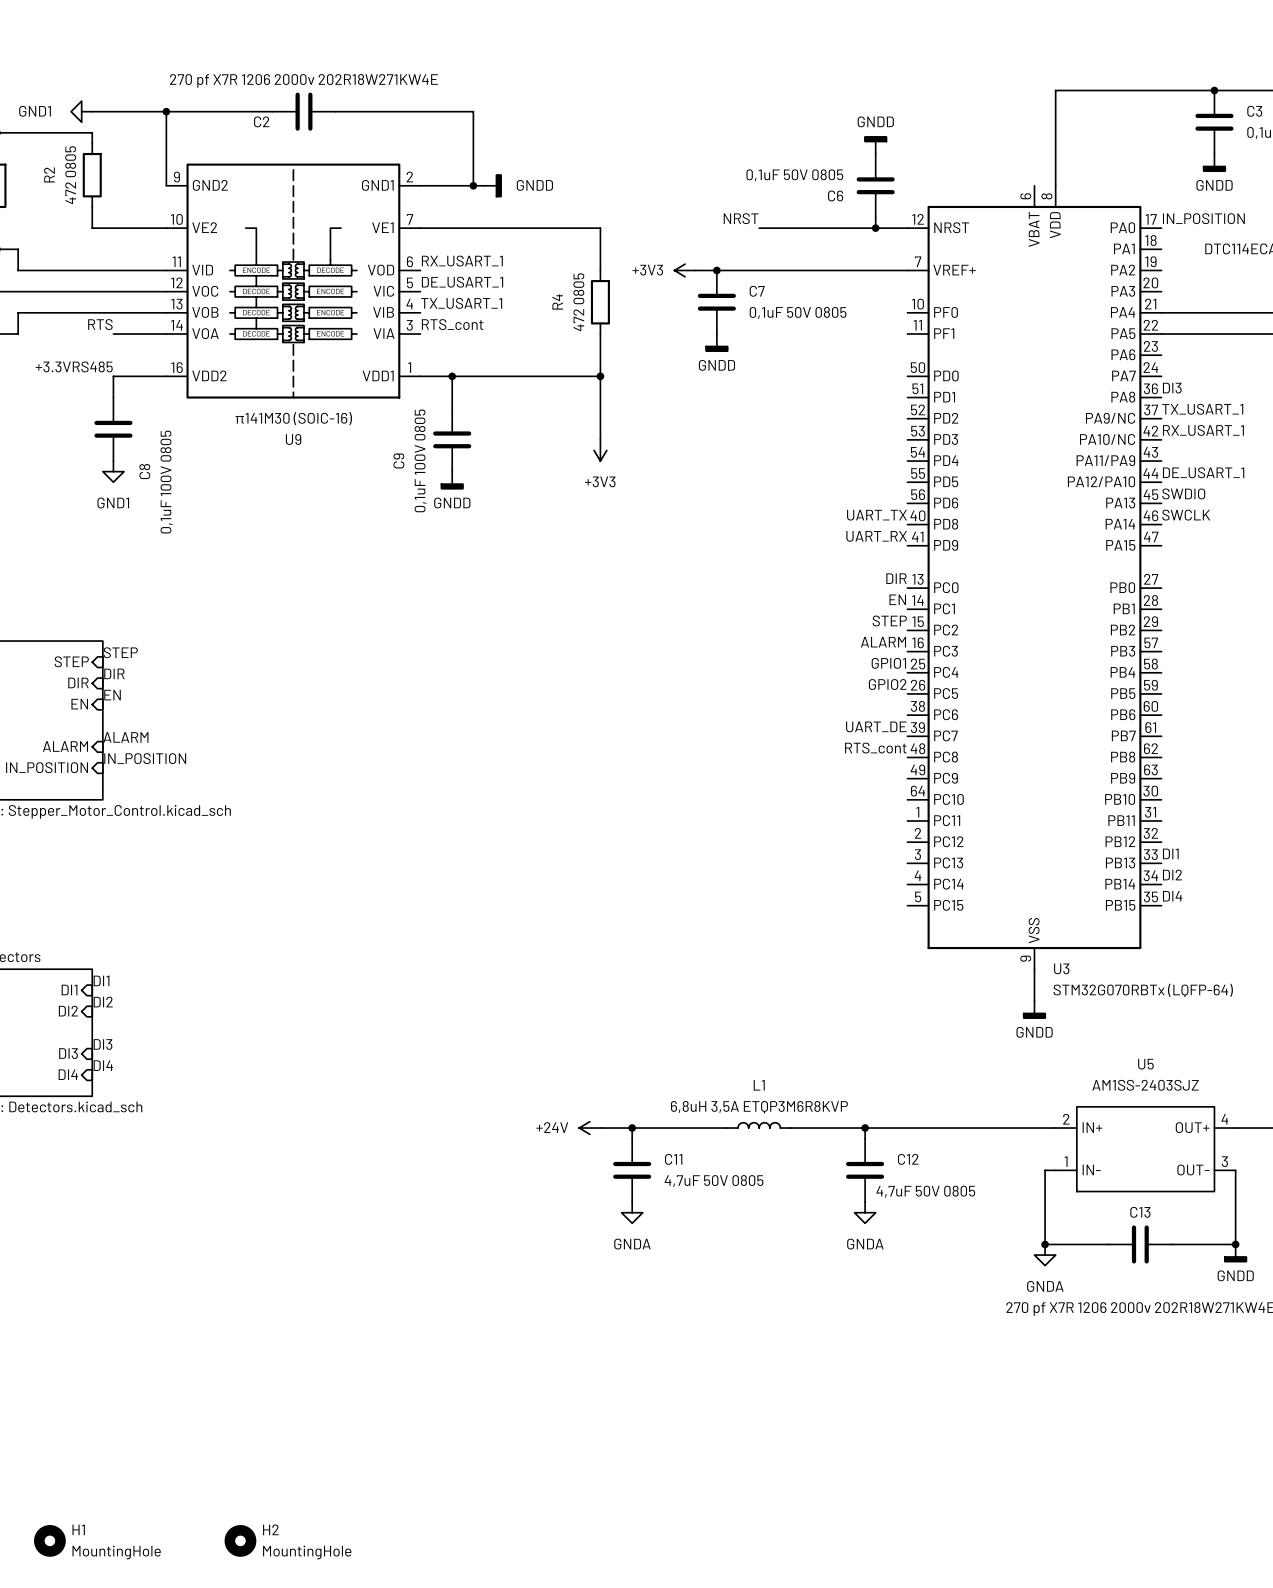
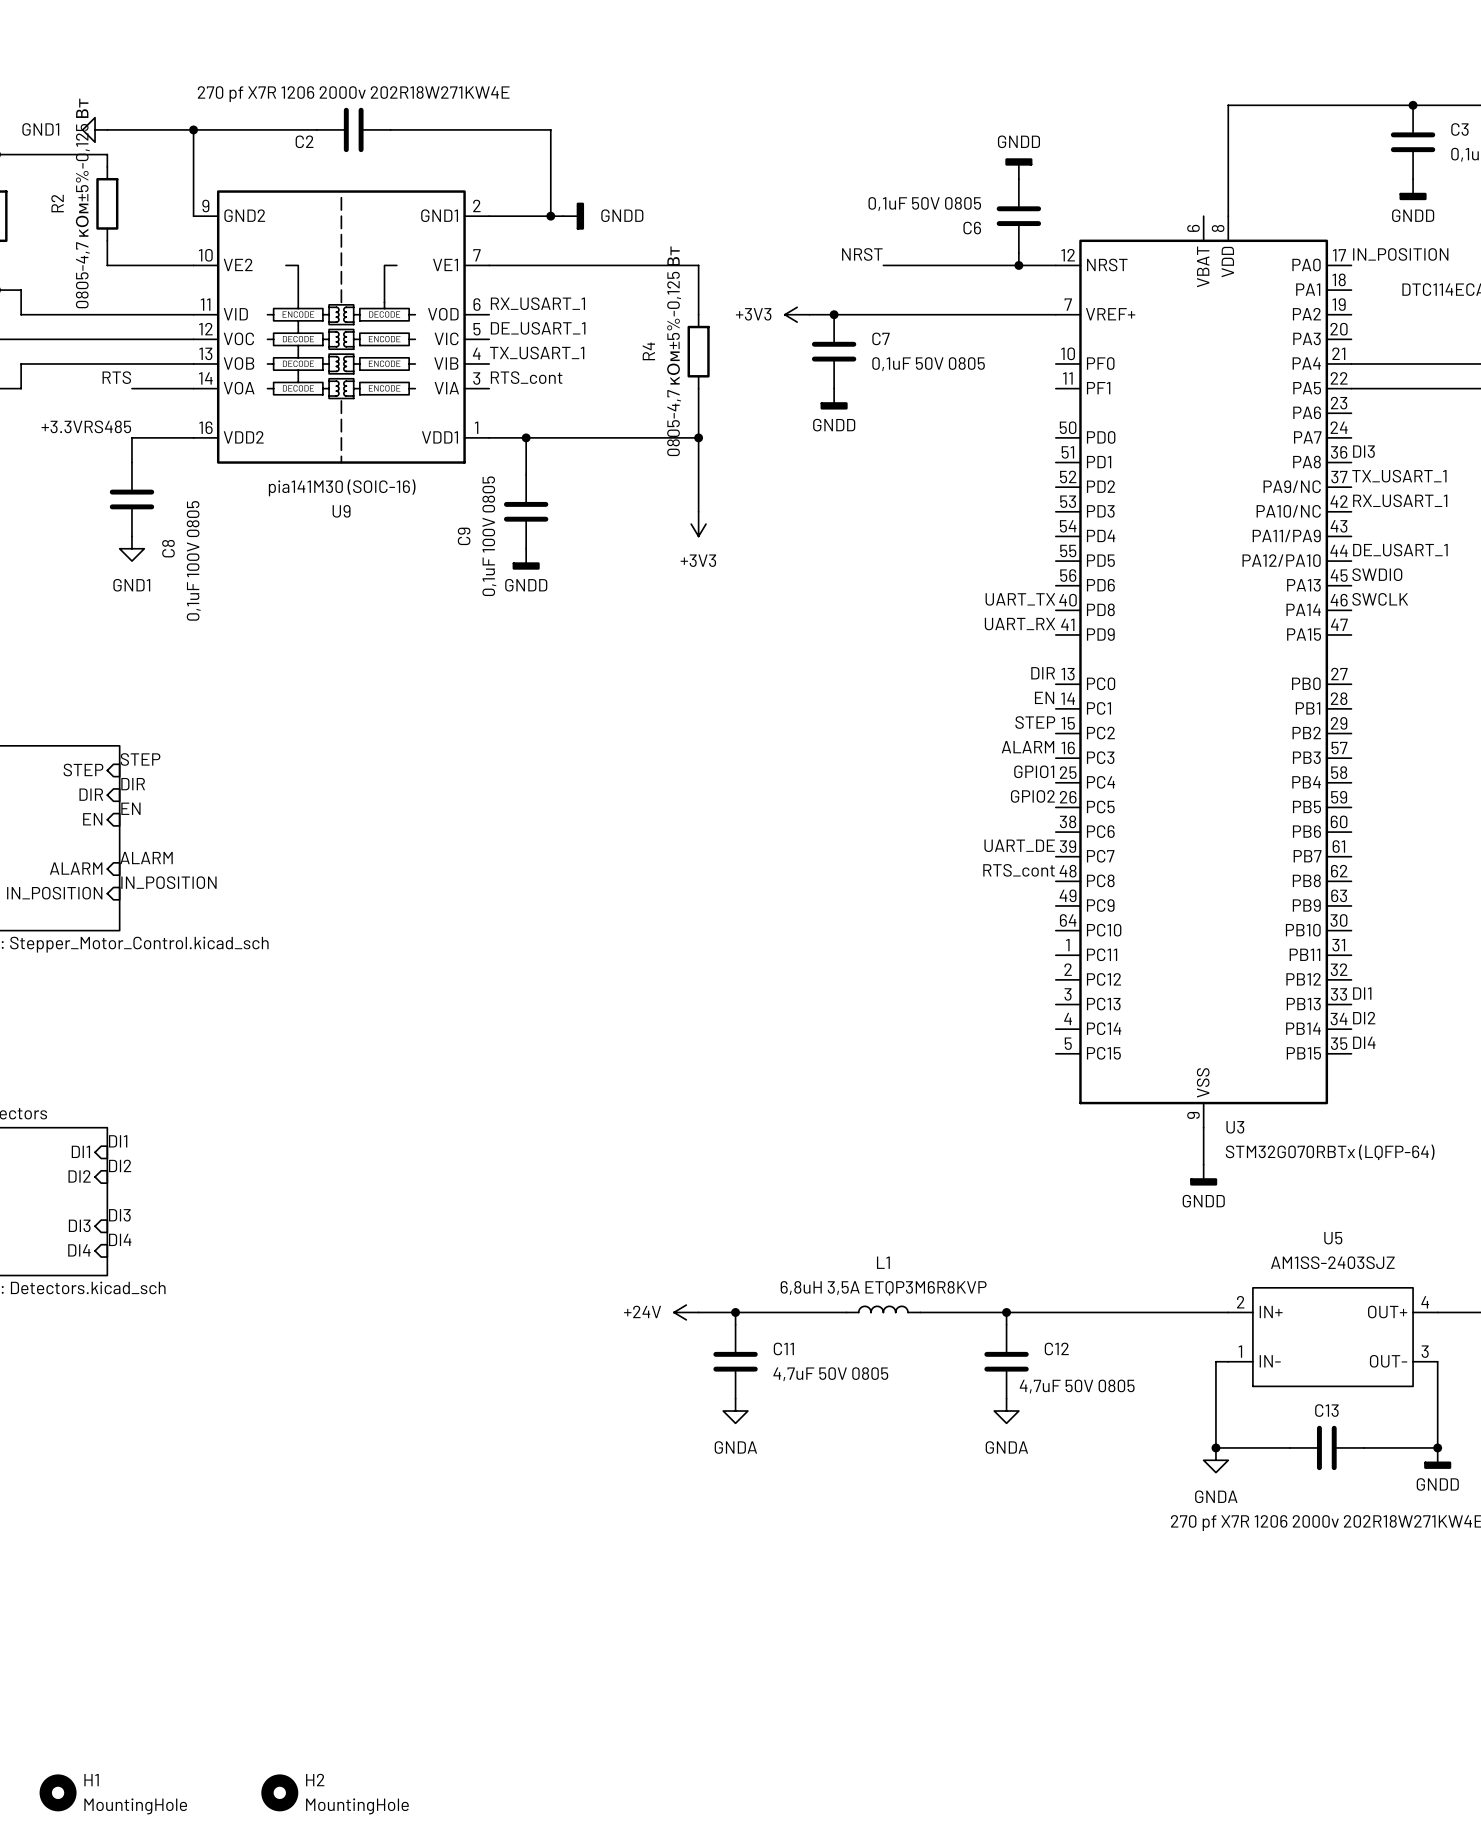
R2 value: 472 0805 (70, 175) -> 0805-4,7 кОм±5%-0,125 Вт (82, 203)
R4 value: 472 0805 (578, 302) -> 0805-4,7 кОм±5%-0,125 Вт (674, 351)
U9 value: π141M30 (SOIC-16) (293, 418) -> pia141M30 (SOIC-16) (342, 487)

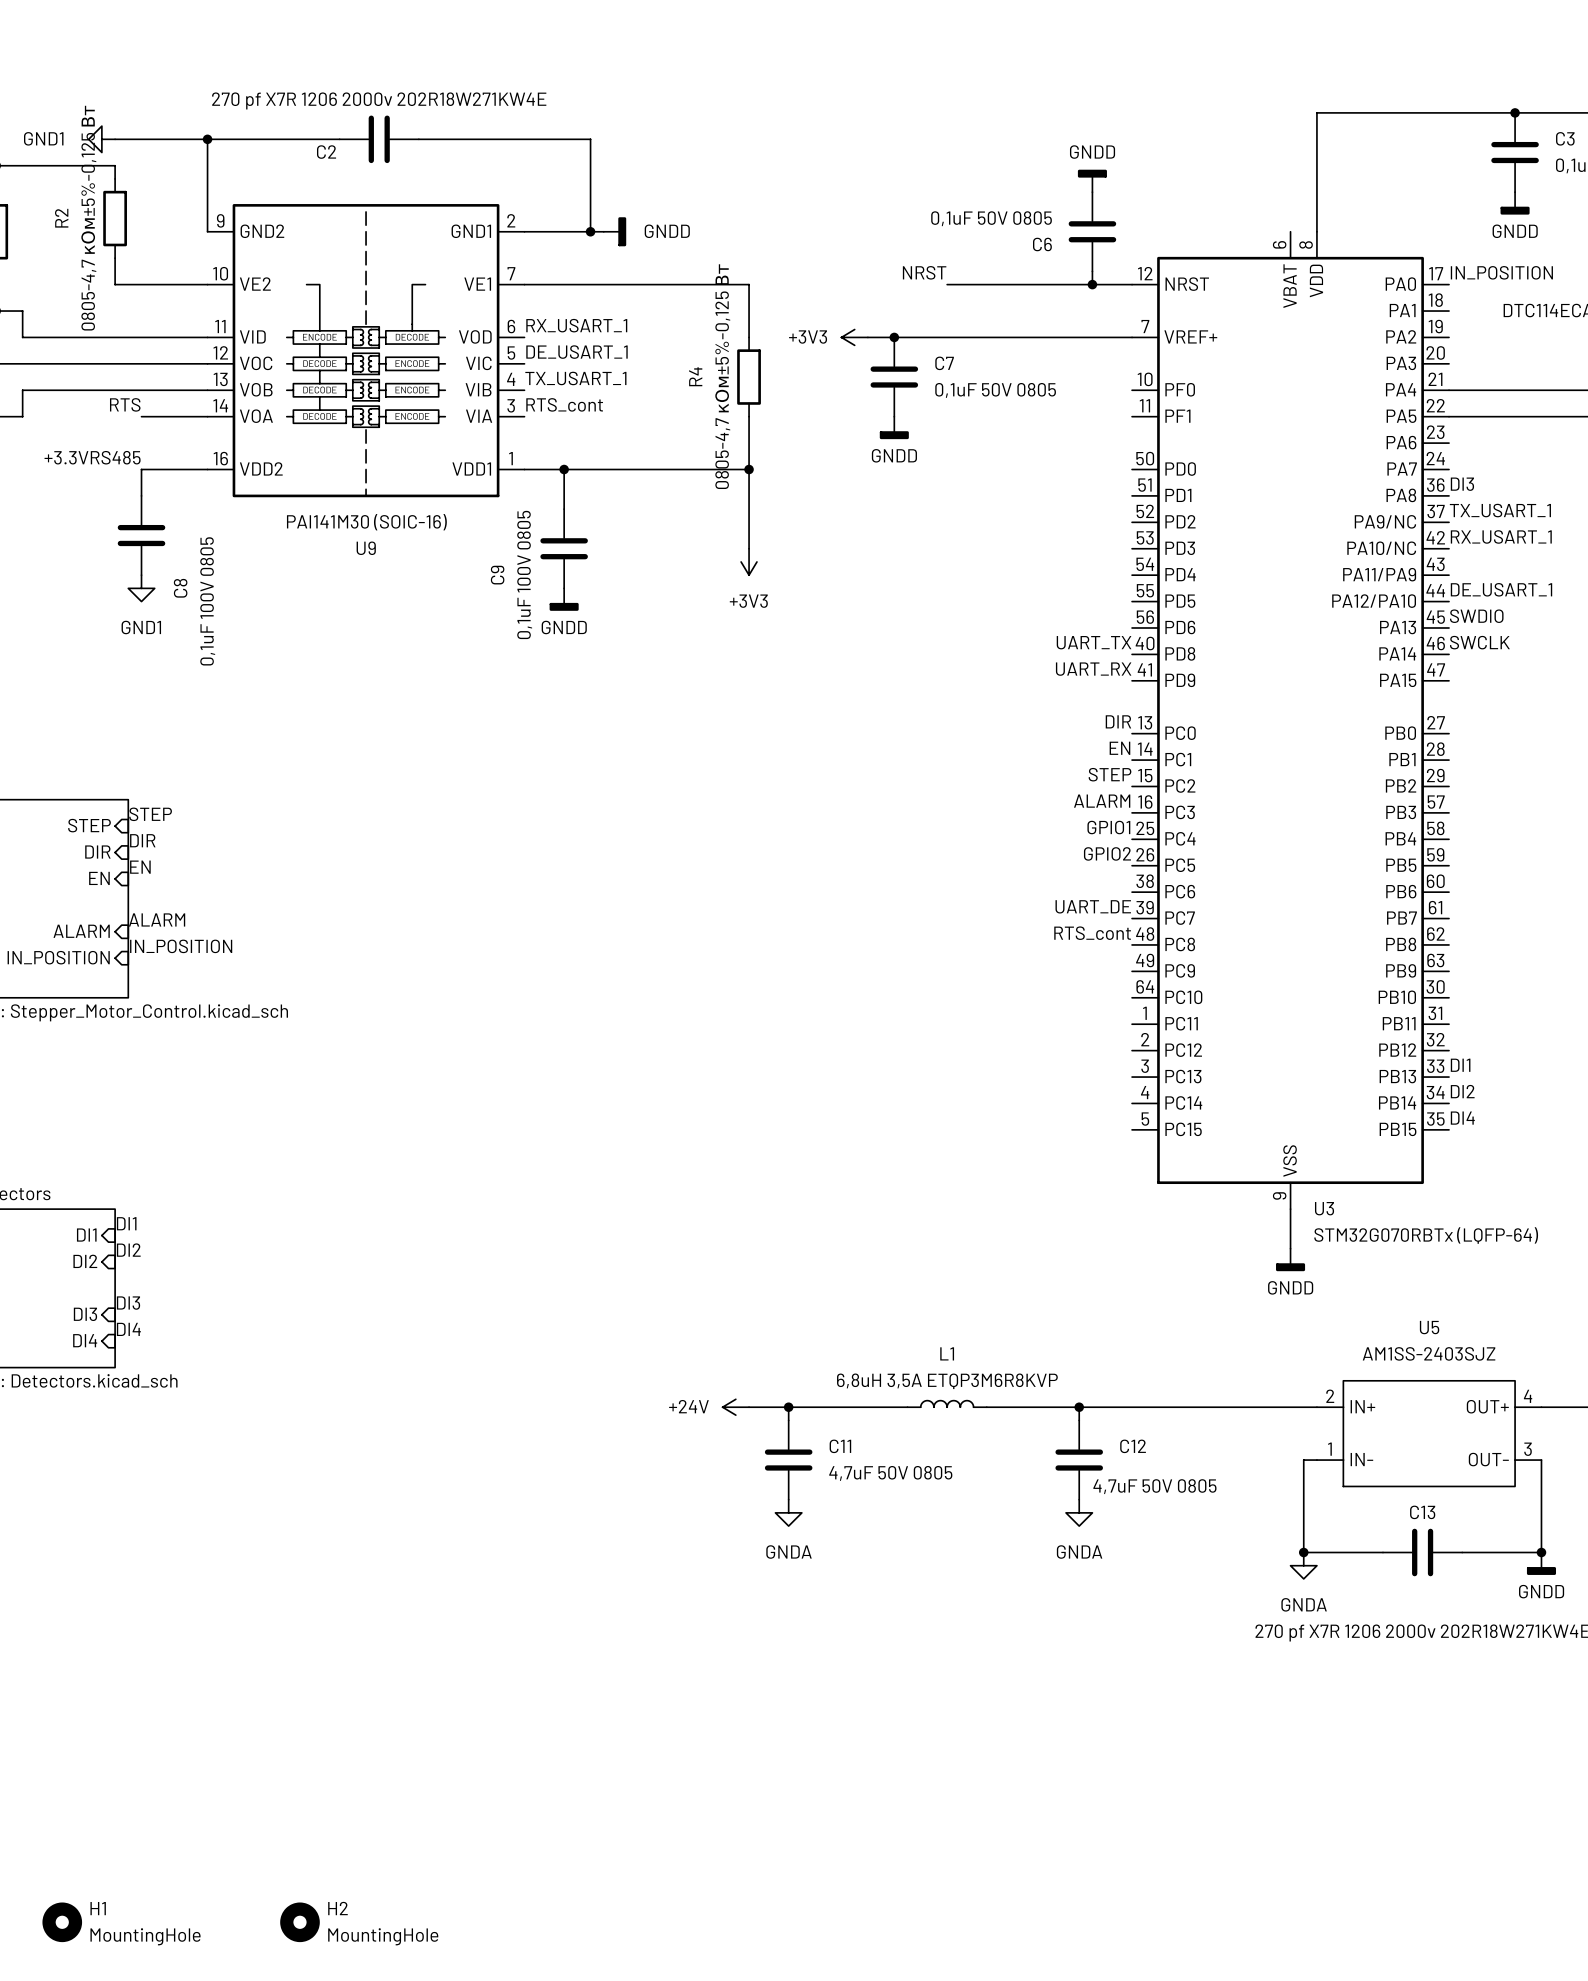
U9 value: pia141M30 (SOIC-16) (342, 487) -> PAI141M30 (SOIC-16) (366, 522)

